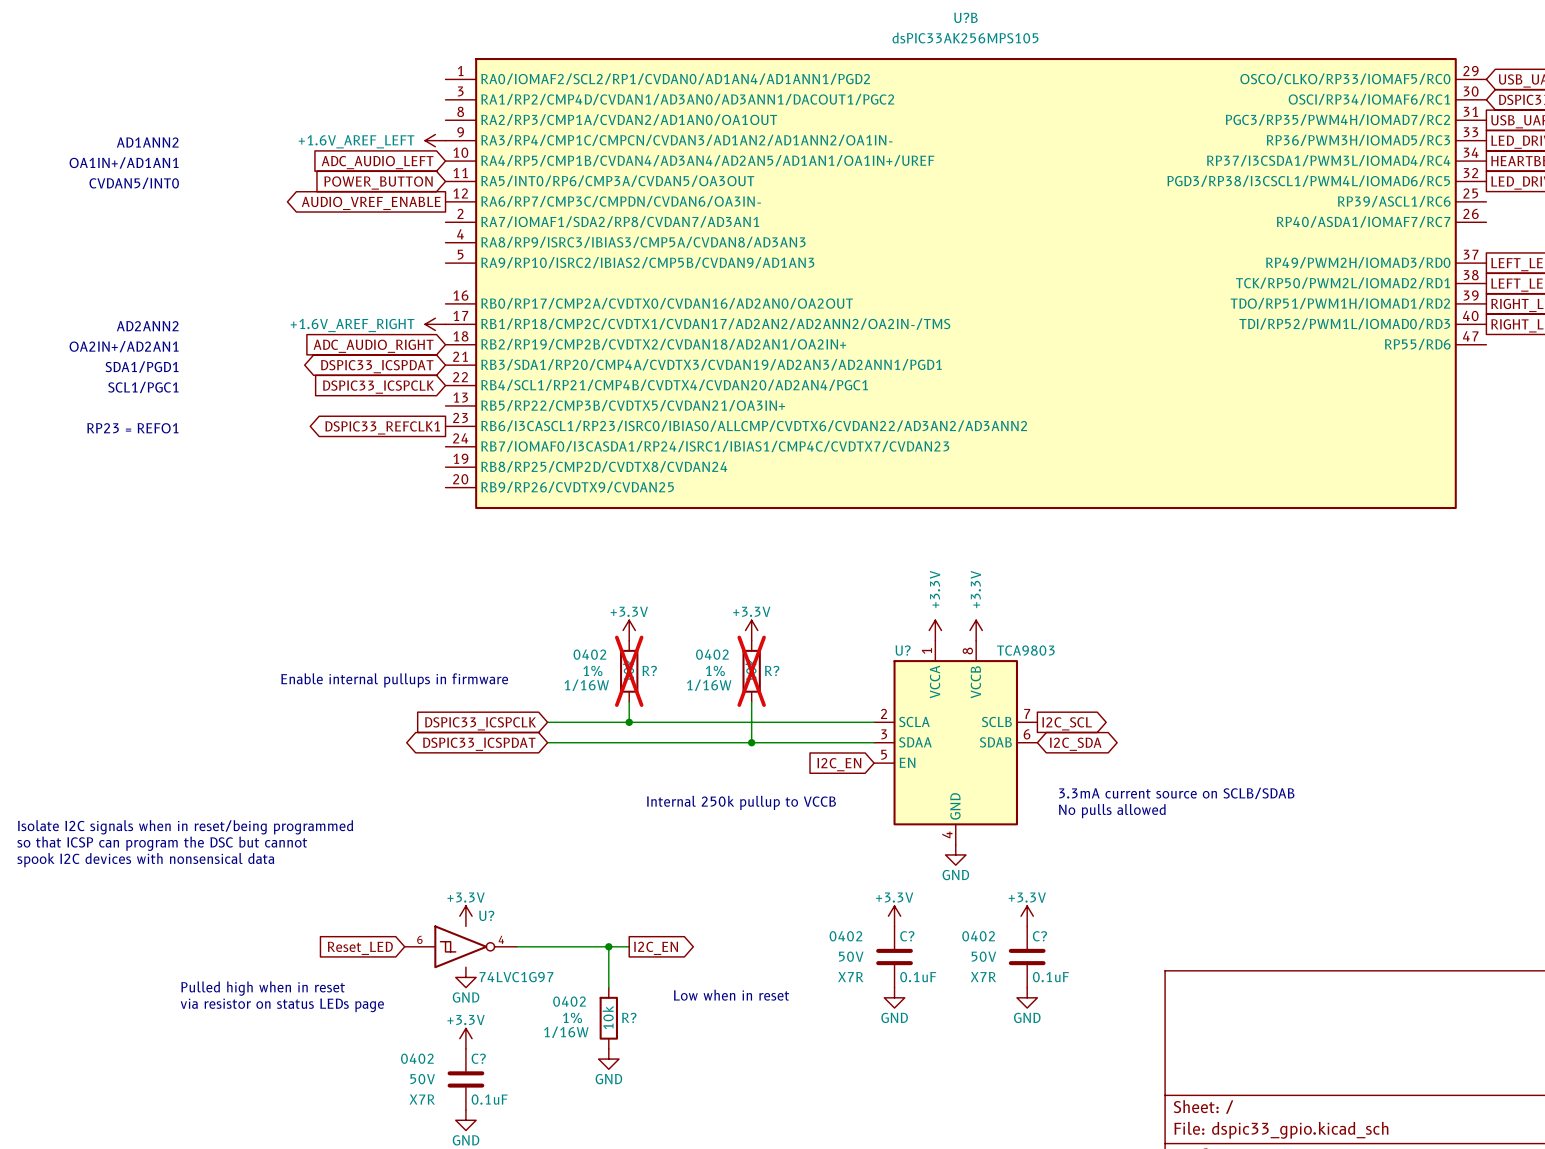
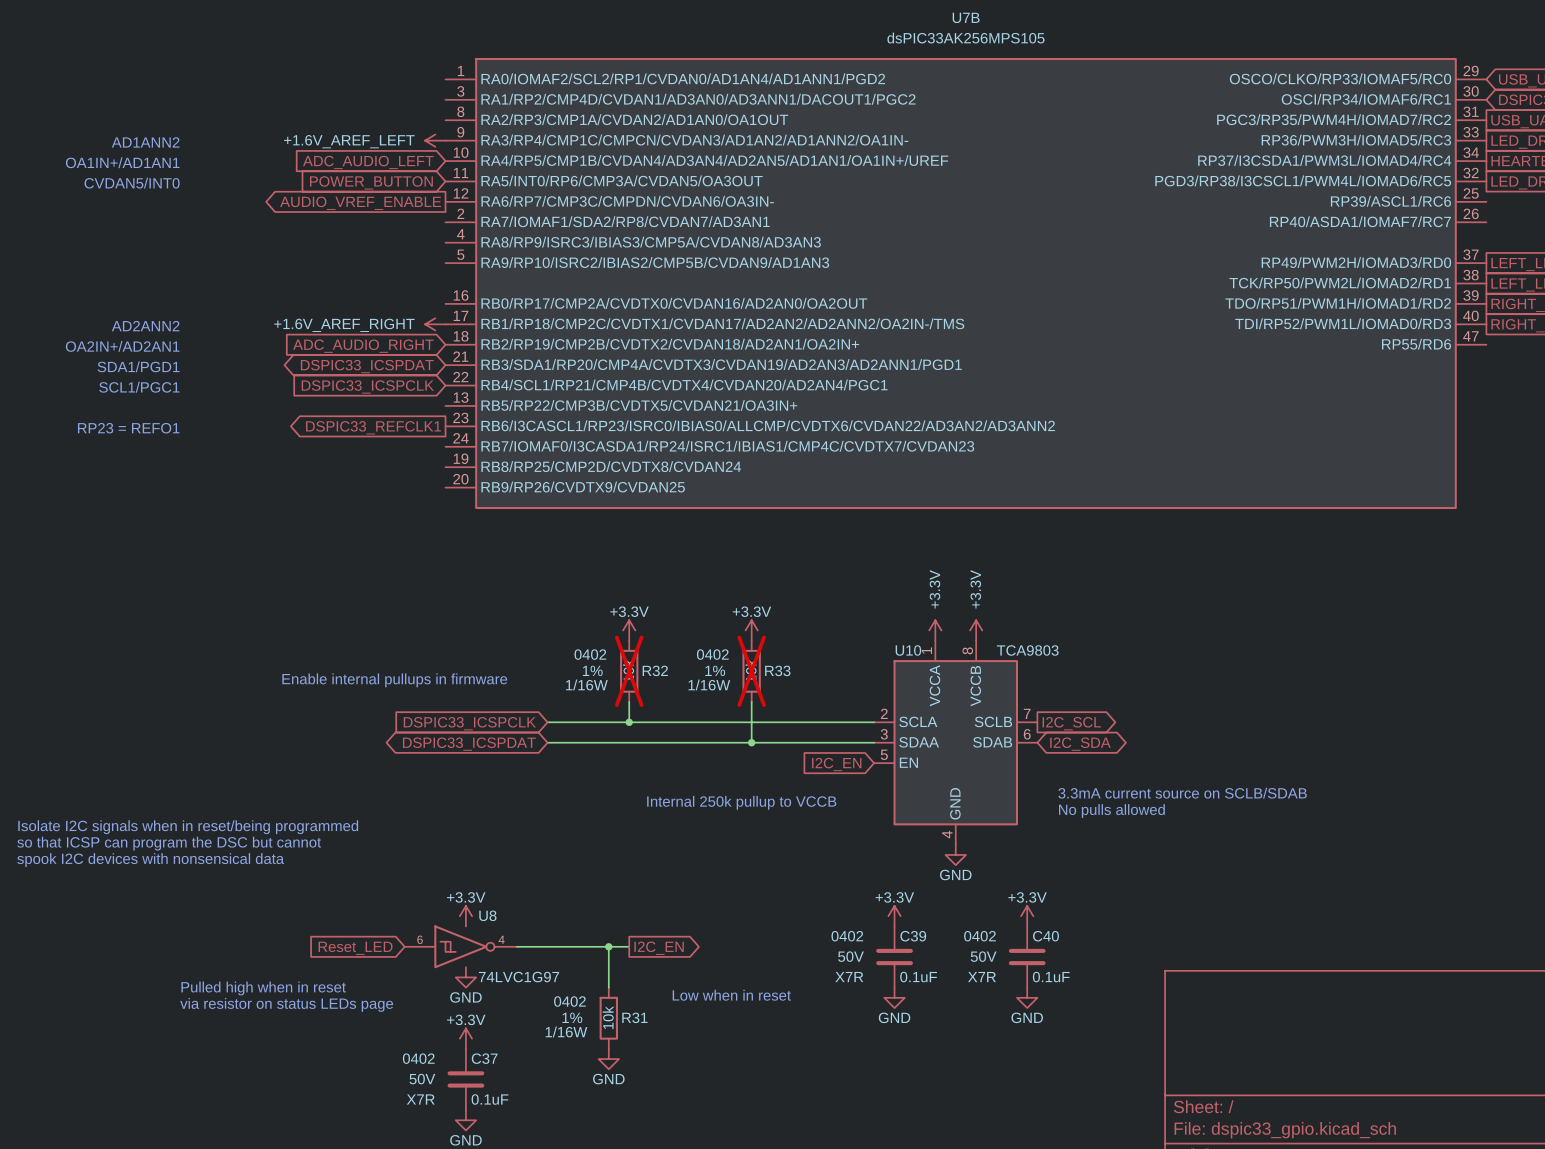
U?B name: U?B (965, 17) -> U7B (966, 17)
U? name: U? (903, 650) -> U10 (908, 650)
R? name: R? (649, 670) -> R32 (655, 670)
R? name: R? (772, 670) -> R33 (777, 670)
U? name: U? (486, 915) -> U8 (487, 915)
C? name: C? (907, 936) -> C39 (913, 936)
C? name: C? (1039, 936) -> C40 (1045, 936)
R? name: R? (629, 1017) -> R31 (634, 1017)
C? name: C? (478, 1058) -> C37 (484, 1058)

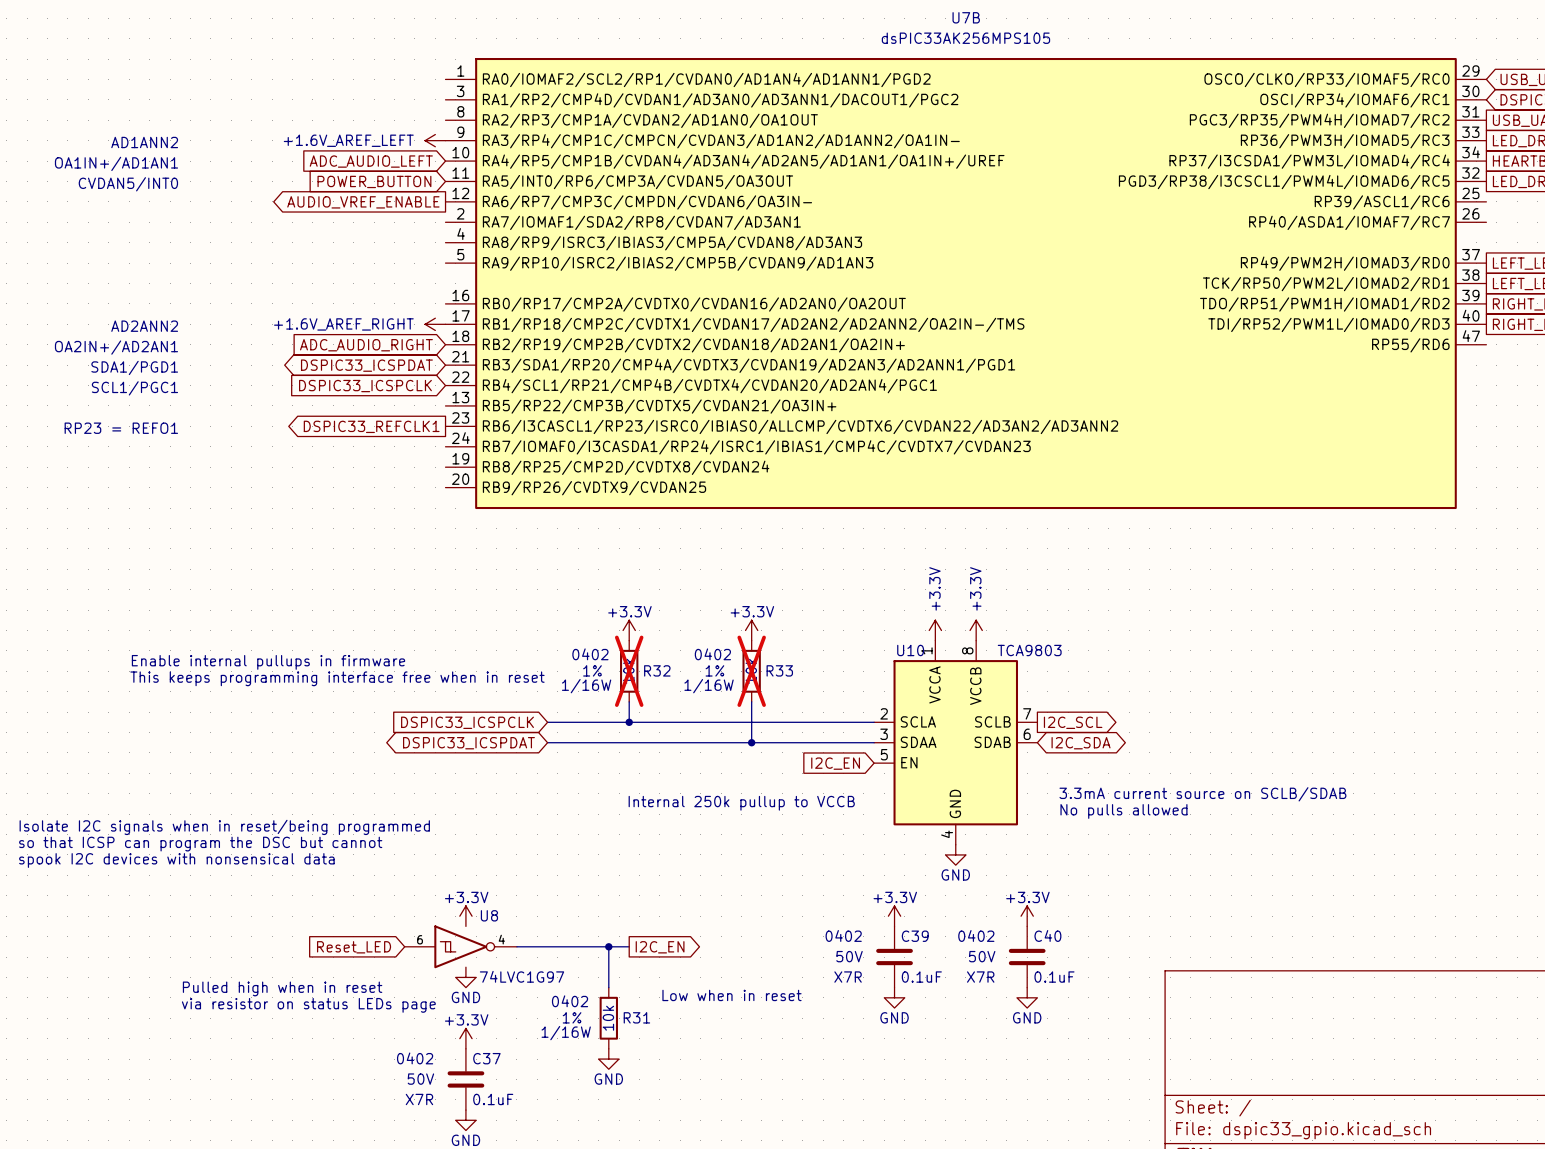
text: none -> Enable internal pullups in firmware (268, 662)
text: none -> This keeps programming interface free when in reset (337, 678)
text: Enable internal pullups in firmware (394, 680) -> none

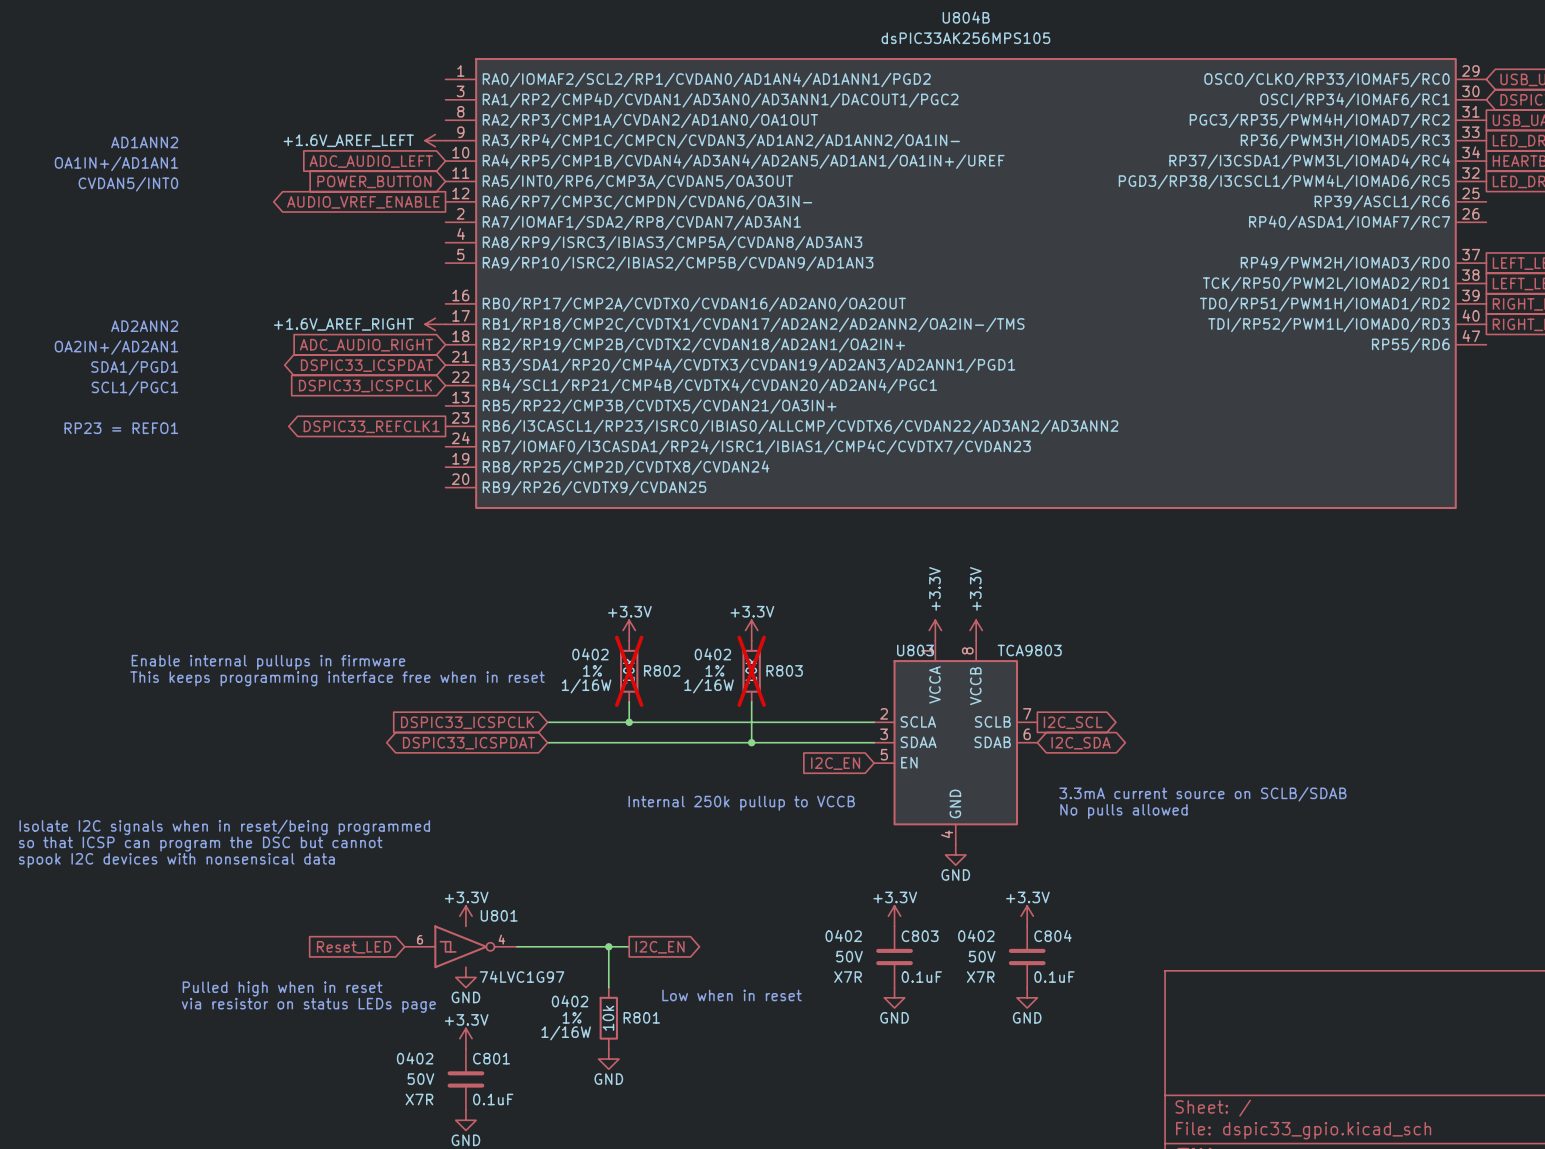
U7B name: U7B (966, 17) -> U804B (966, 17)
U10 name: U10 (910, 650) -> U803 (915, 650)
R32 name: R32 (657, 670) -> R802 (662, 670)
R33 name: R33 (779, 670) -> R803 (784, 670)
U8 name: U8 (489, 915) -> U801 (499, 915)
C40 name: C40 (1047, 935) -> C804 (1053, 935)
C39 name: C39 (915, 936) -> C803 (920, 936)
R31 name: R31 (636, 1017) -> R801 (641, 1017)
C37 name: C37 (486, 1058) -> C801 (491, 1058)

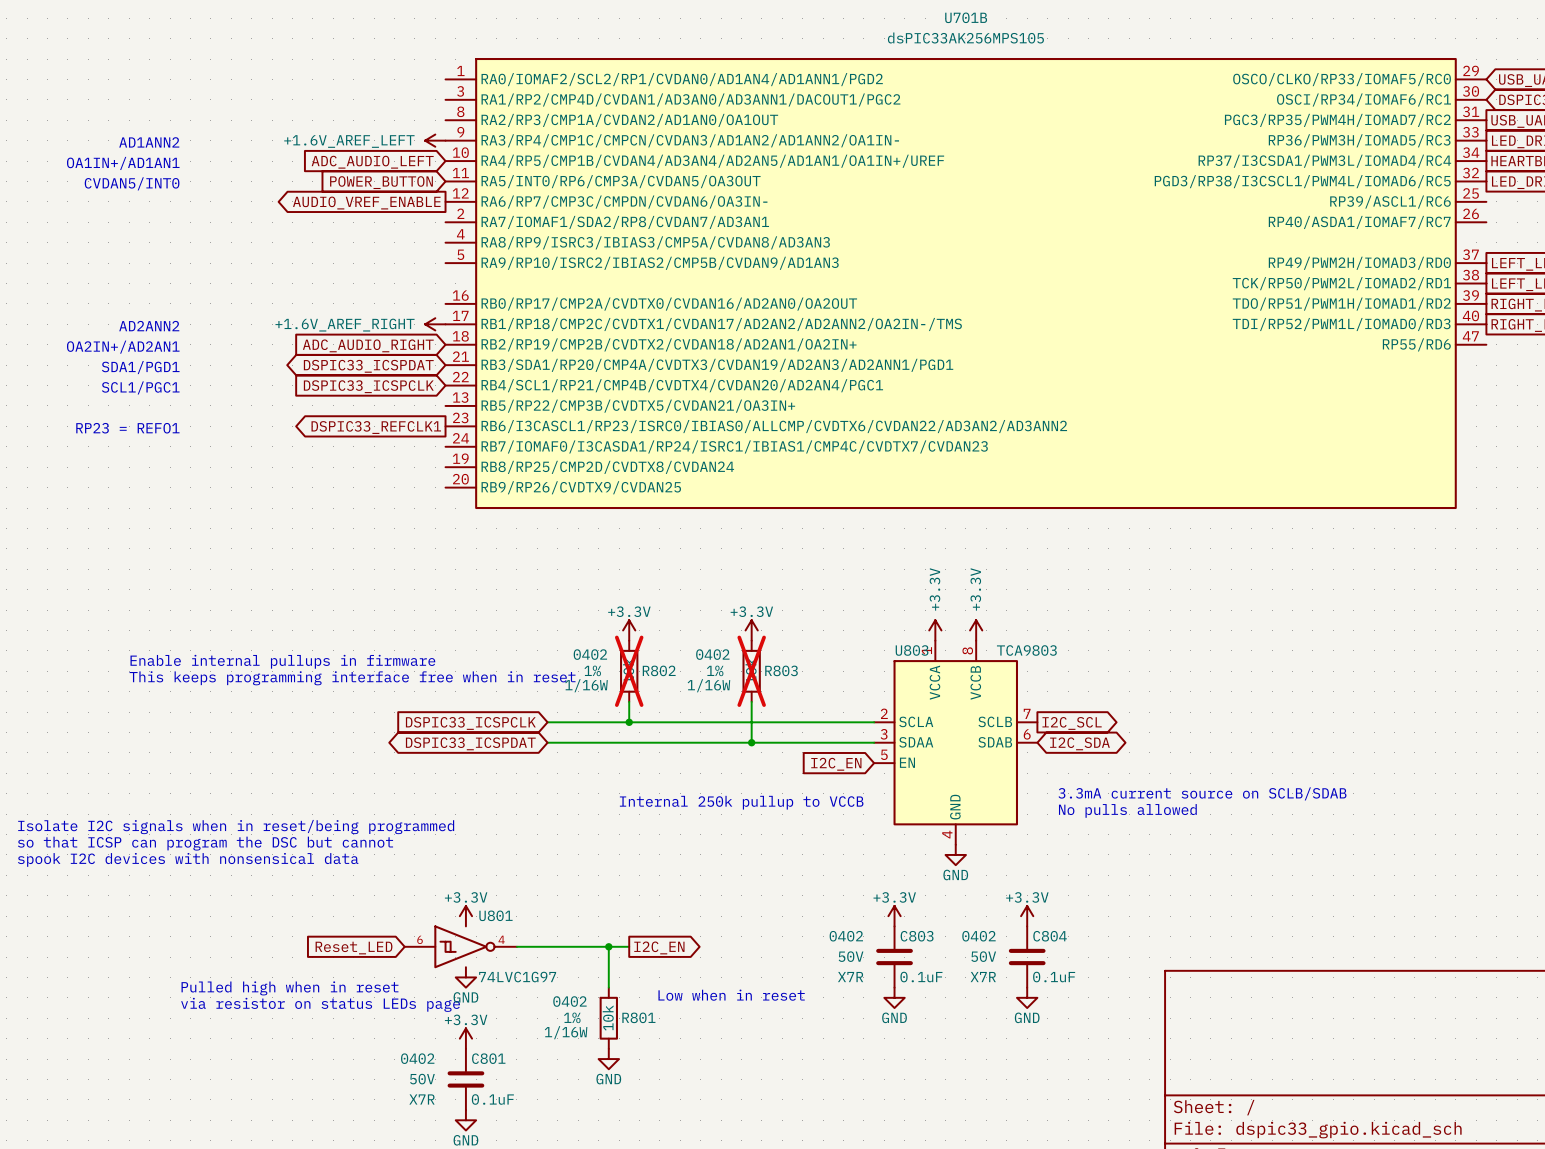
U804B name: U804B (966, 17) -> U701B (966, 17)

